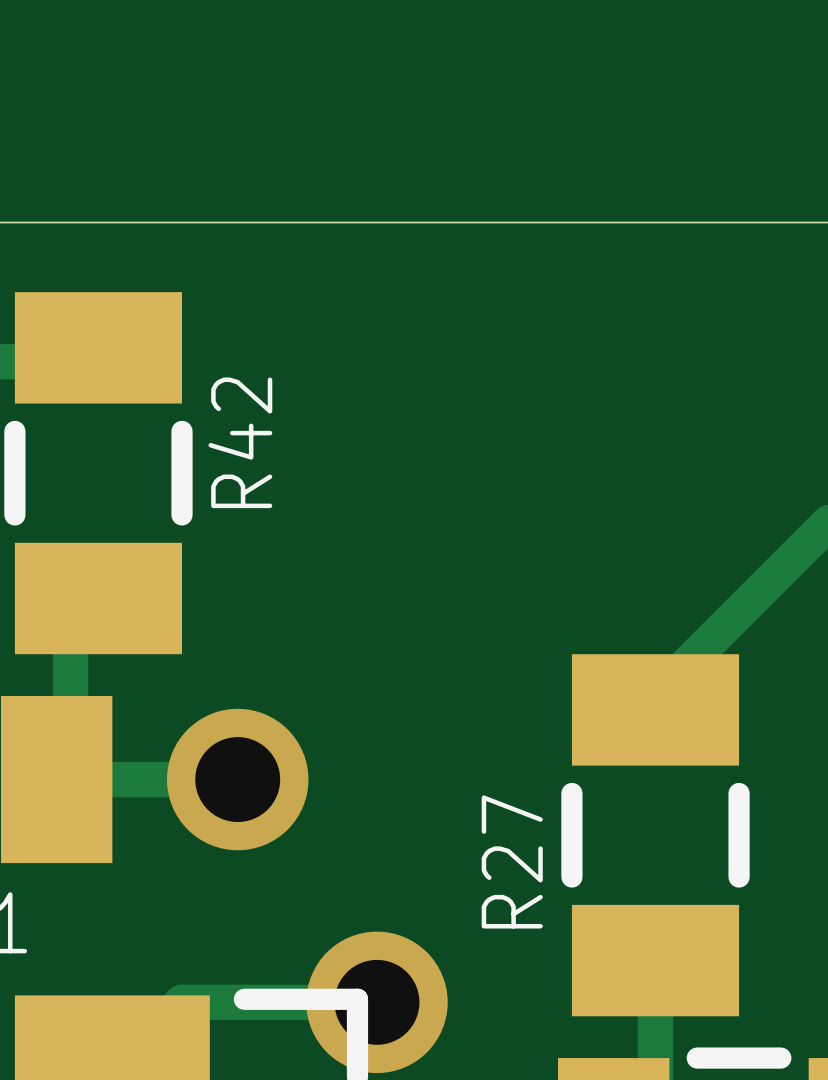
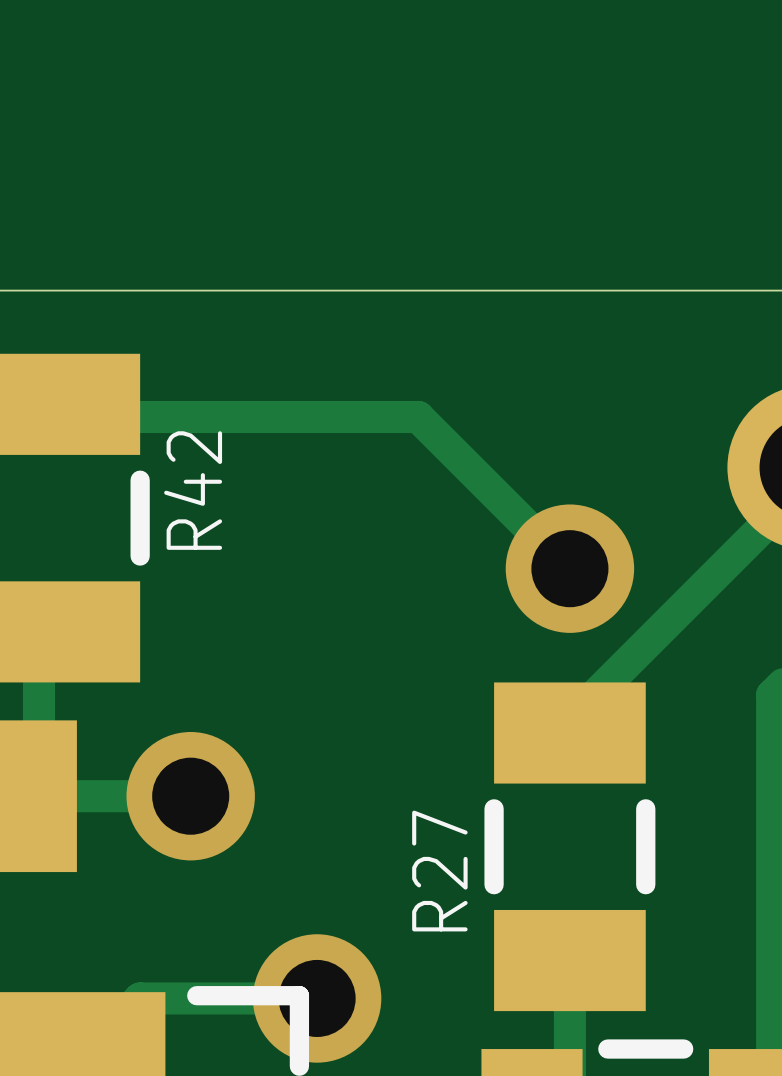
track: none -> (64, 416) (418, 416) (569, 568)
via: none -> (569, 568)

